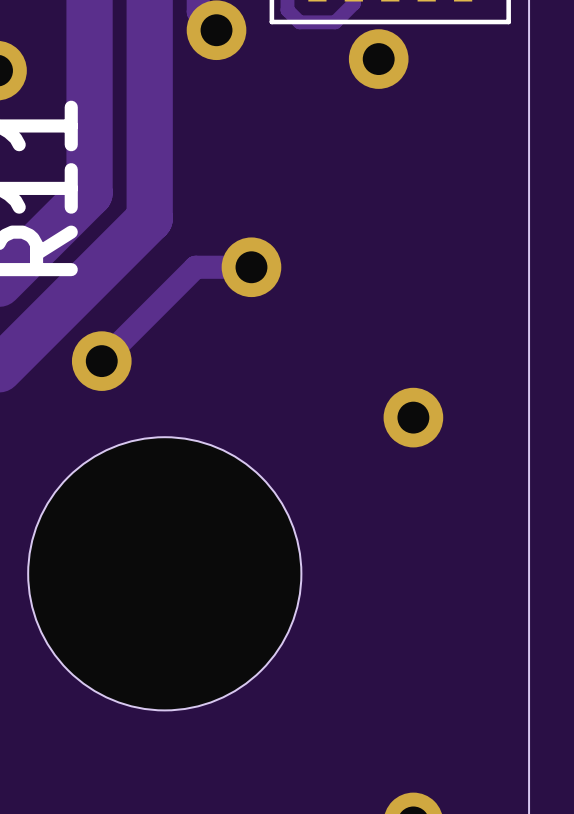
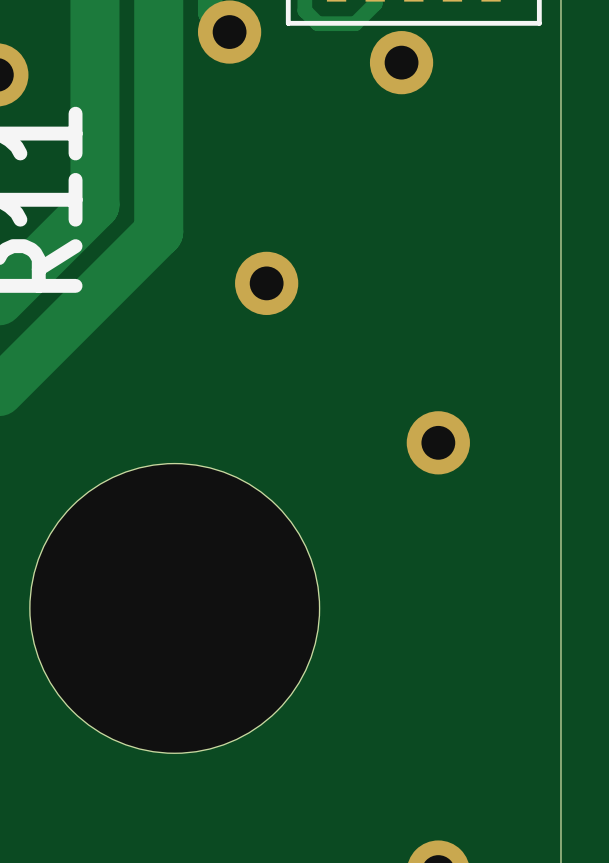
track: (251, 267) (195, 267) (101, 361) -> none
via: (101, 361) -> none

